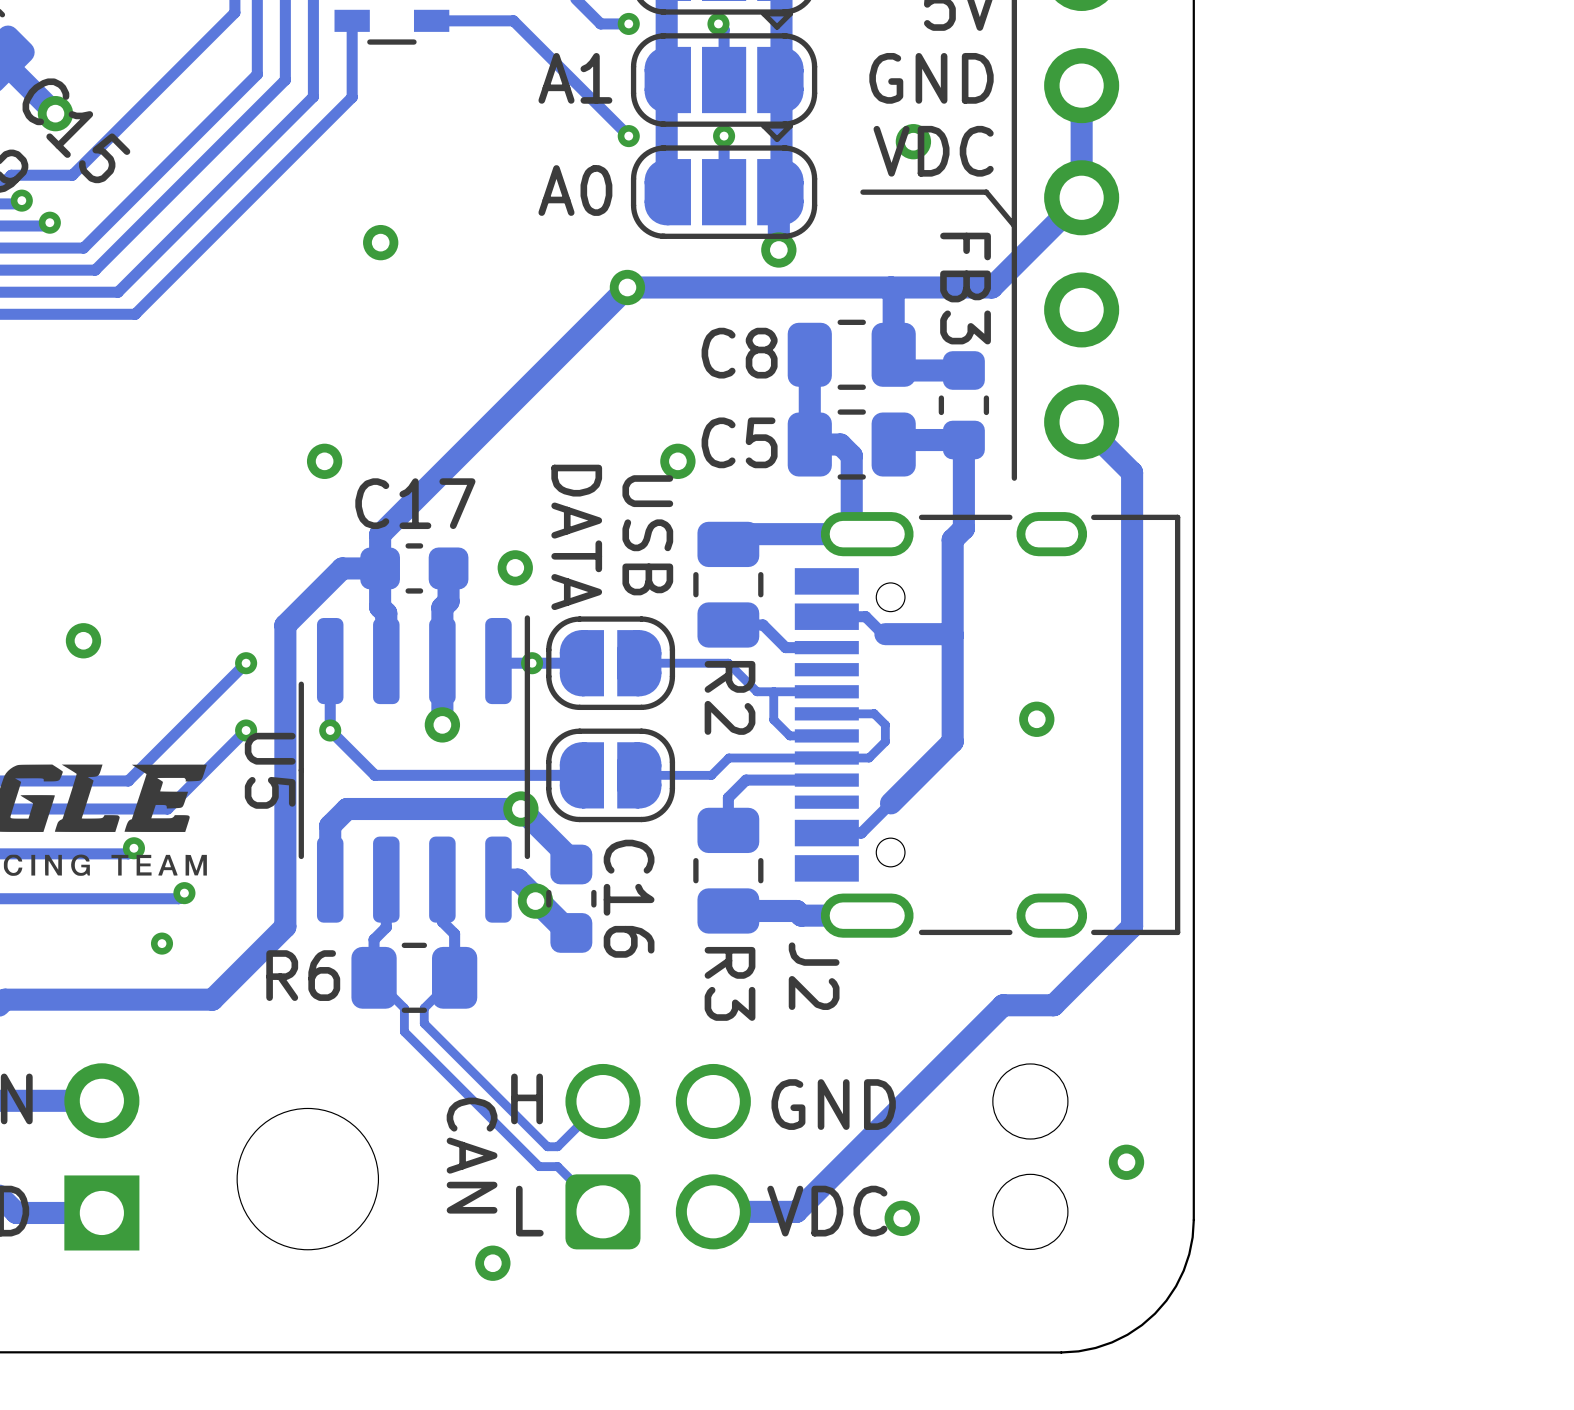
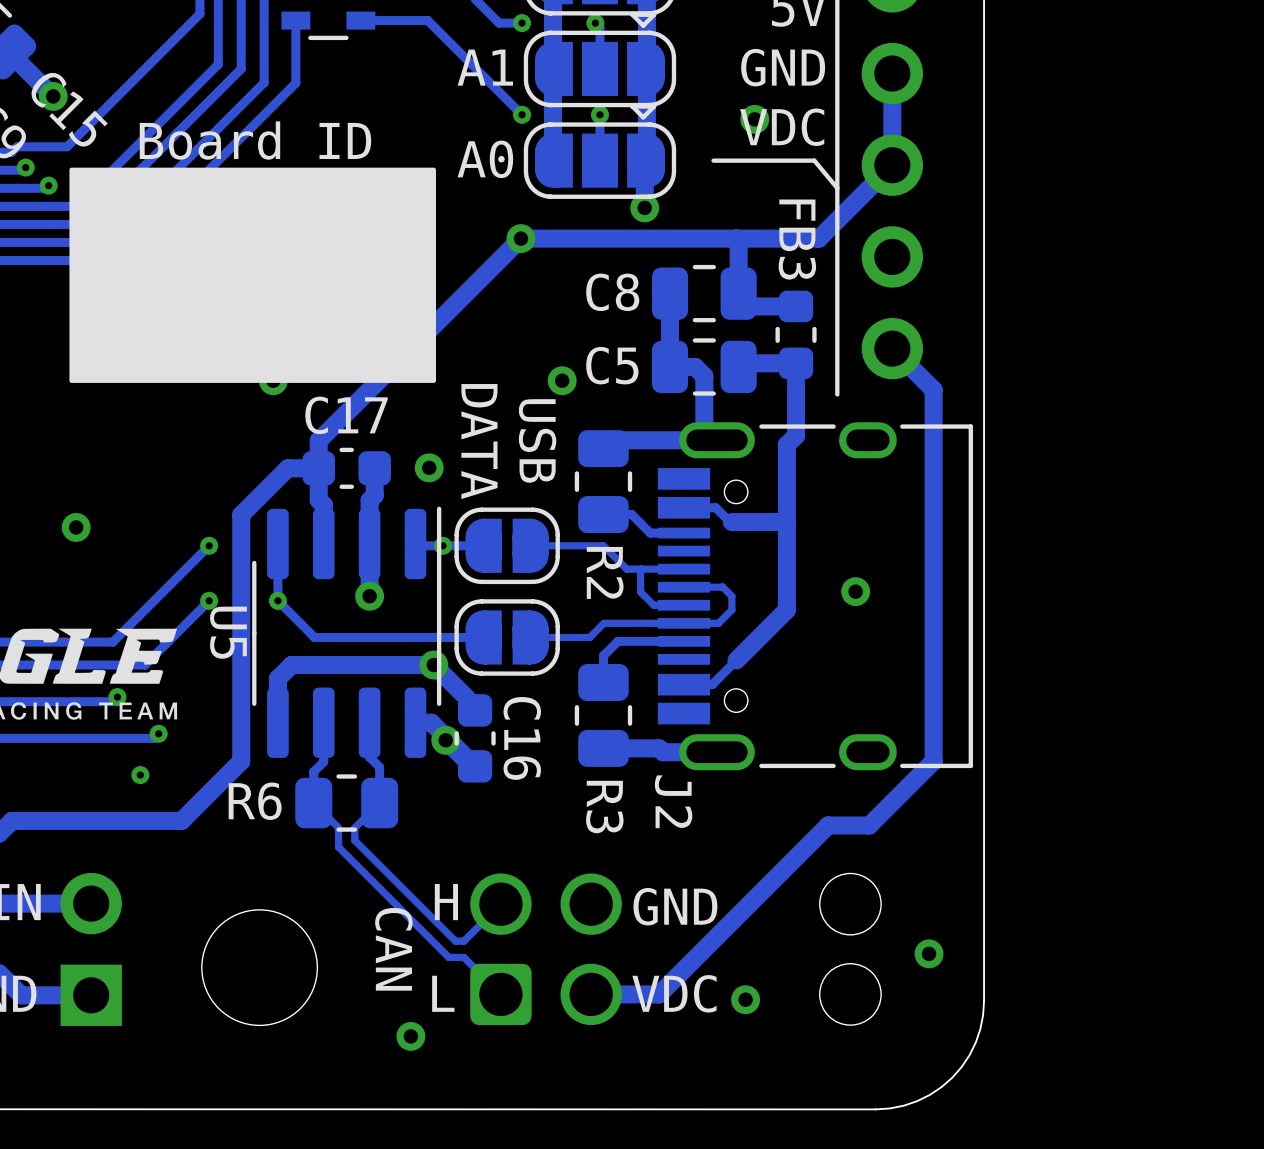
text: none -> Board ID (255, 140)
drawing: none -> [69, 167, 436, 383]

